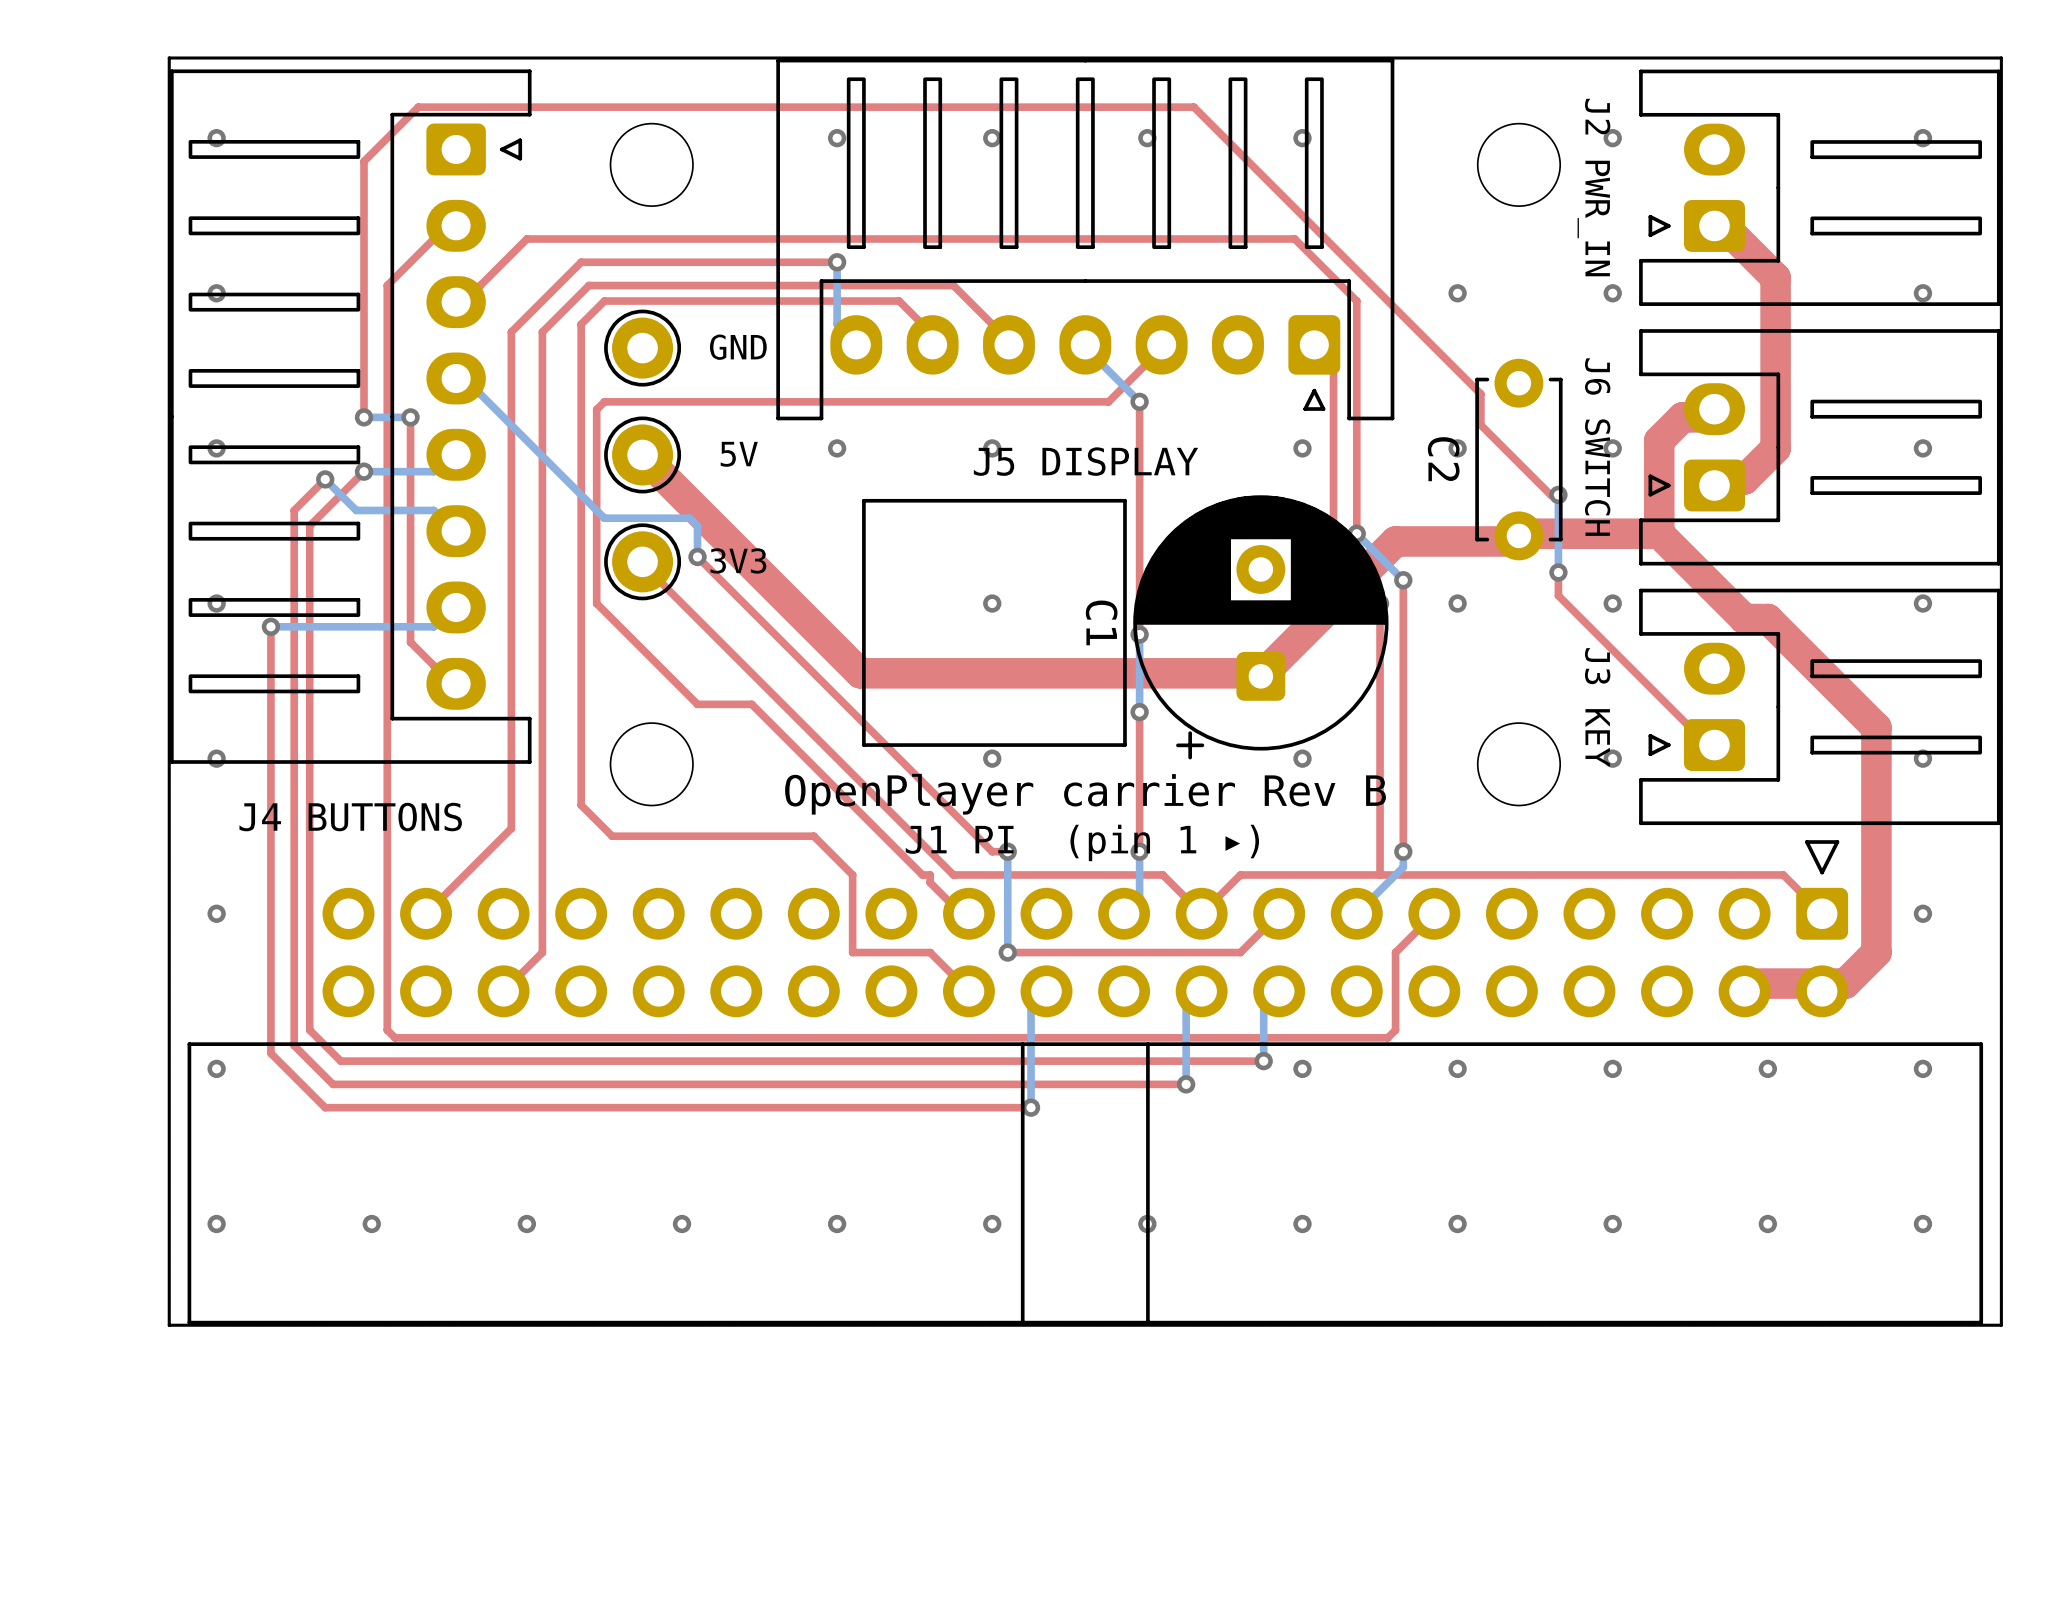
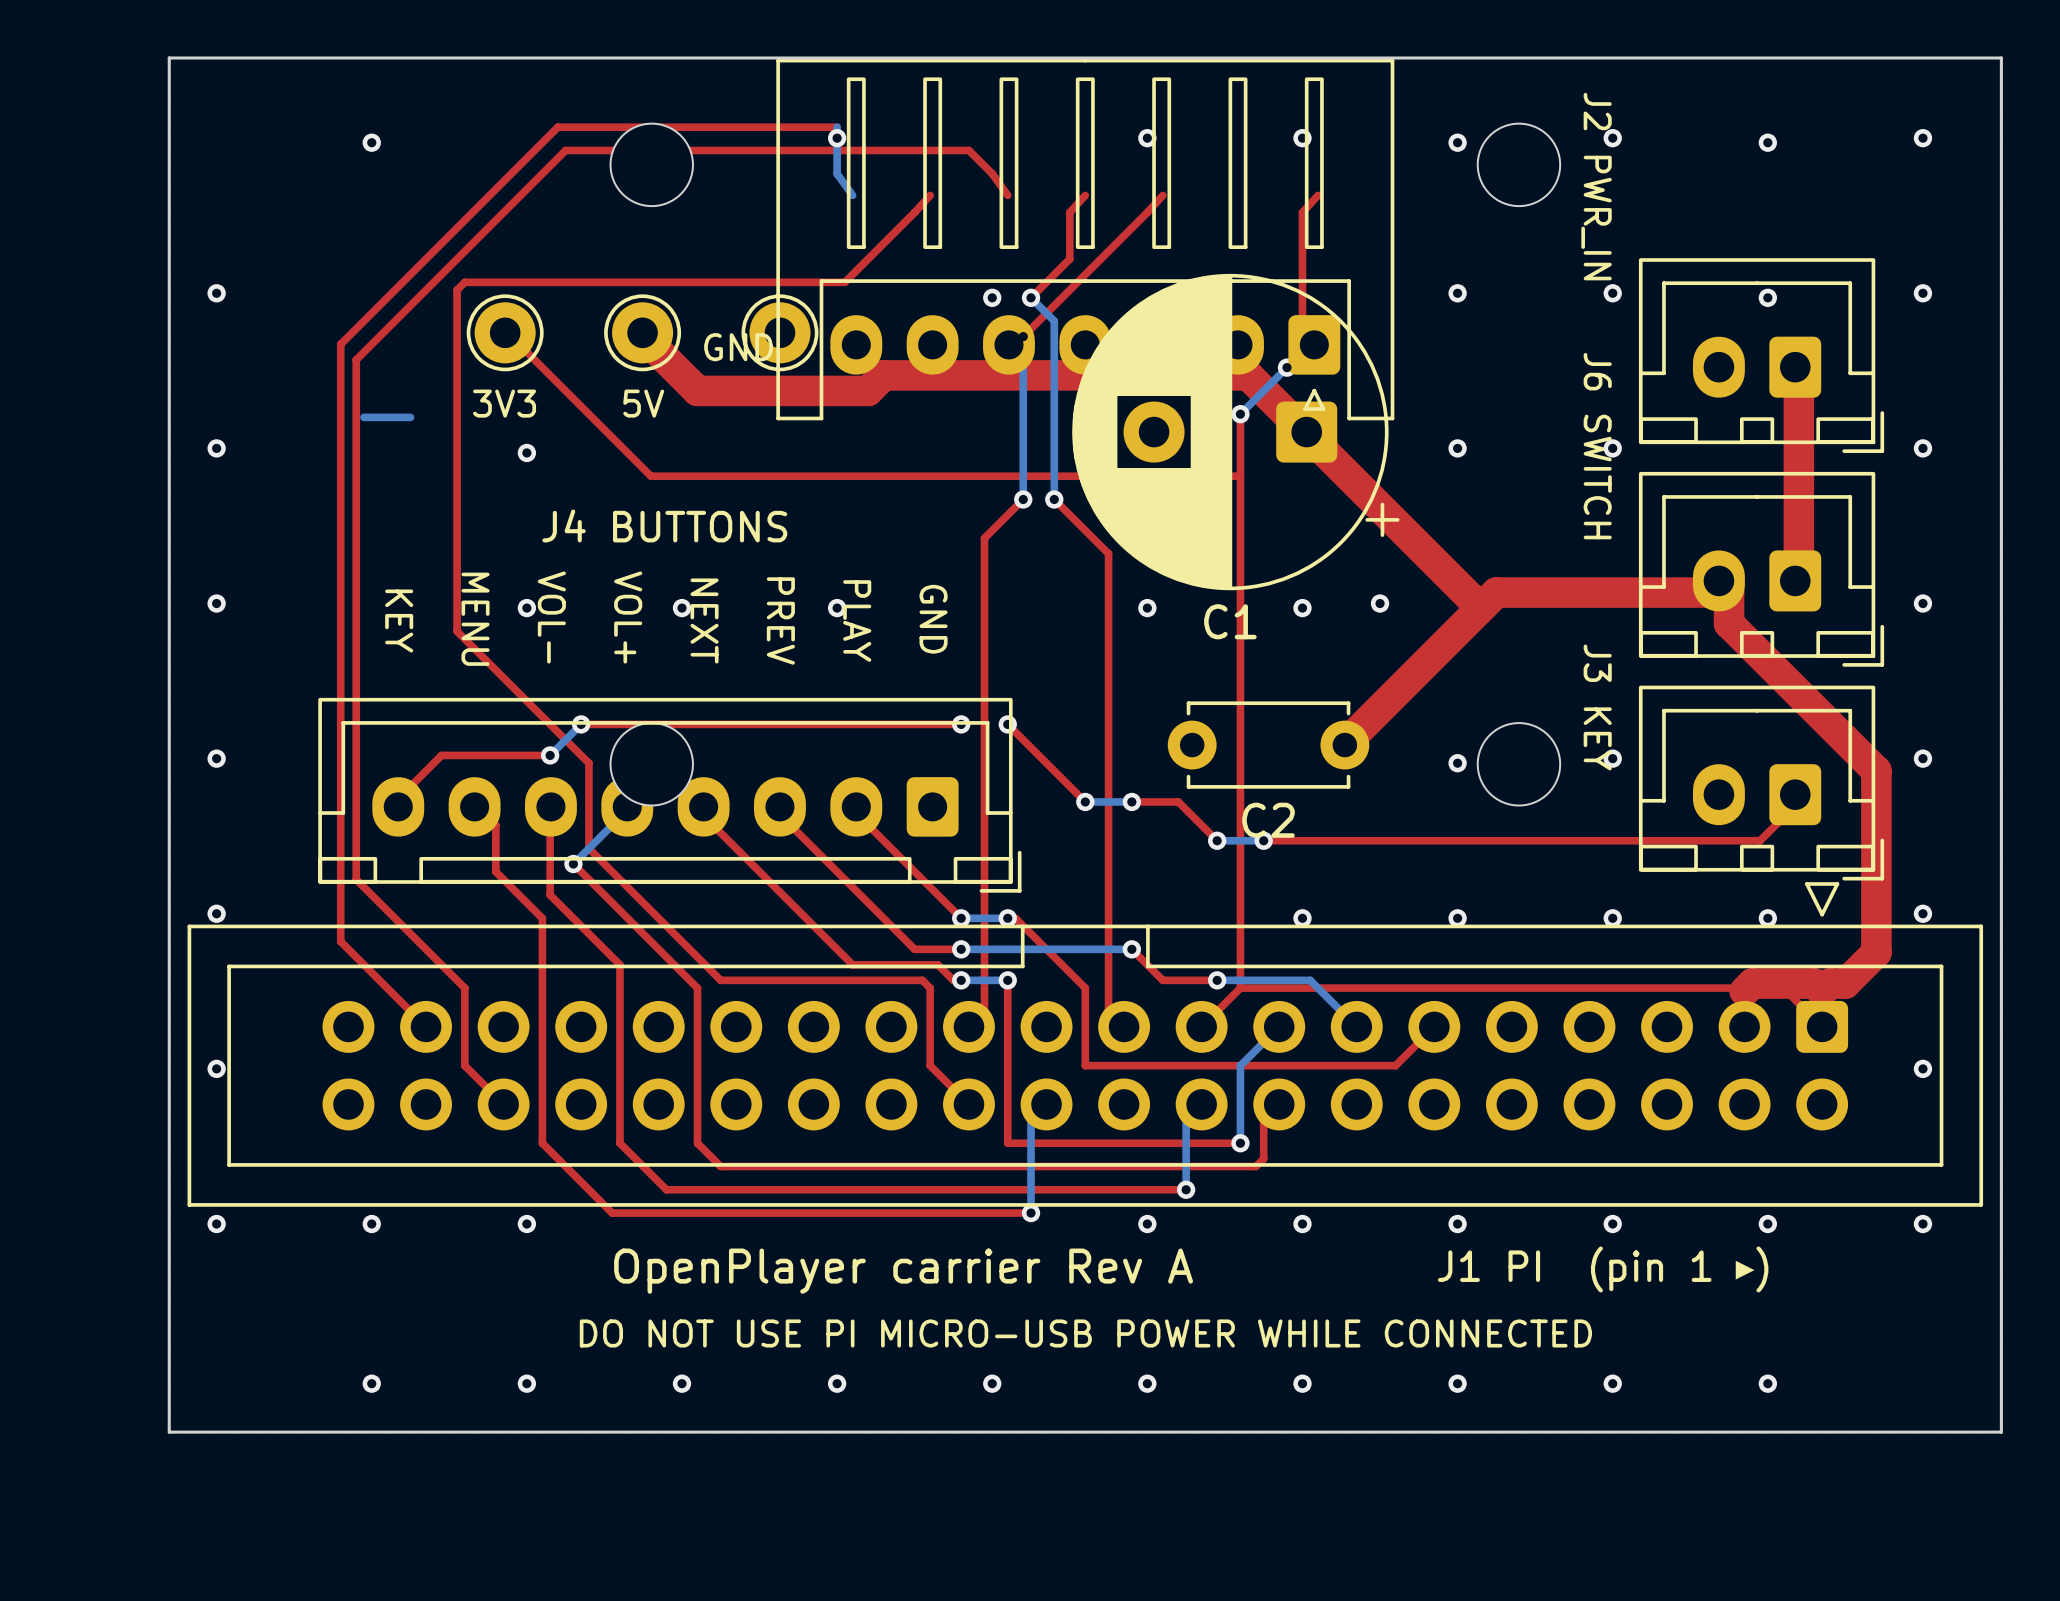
top track: none -> (837, 127) (557, 127) (340, 344) (340, 941) (426, 1026)
bottom track: none -> (837, 127) (837, 173) (852, 195)
via: (216, 138) -> none
via: (992, 138) -> none
via: none -> (371, 142)
via: none -> (1457, 142)
via: none -> (1767, 142)
part: (1819, 187) -> none
top track: none -> (930, 195) (844, 282) (464, 282) (457, 290) (457, 631) (588, 763) (588, 848) (720, 980) (922, 980) (930, 988) (930, 1065) (968, 1104)
top track: none -> (1007, 195) (992, 173) (968, 150) (565, 150) (356, 359) (356, 879) (464, 988) (464, 1065) (503, 1104)
top track: none -> (1085, 195) (1069, 212) (1069, 259) (1031, 297)
top track: none -> (1162, 195) (1023, 336)
top track: none -> (1317, 195) (1302, 212) (1302, 352) (1286, 367)
top track: (456, 225) (433, 238) (387, 285) (387, 1030) (395, 1037) (1387, 1037) (1395, 1030) (1395, 952) (1434, 913) -> none
top track: (1714, 225) (1729, 231) (1775, 277) (1775, 448) (1744, 479) (1729, 479) (1714, 485) -> none
top track: (837, 262) (581, 262) (511, 332) (511, 828) (426, 913) -> none
bottom track: (837, 262) (837, 324) (856, 344) -> none
via: (837, 262) -> none
via: none -> (992, 297)
bottom track: none -> (1031, 297) (1054, 321) (1054, 499)
via: none -> (1031, 297)
via: none -> (1767, 297)
top track: (456, 302) (480, 285) (526, 238) (1294, 238) (1356, 301) (1356, 533) -> none
top track: none -> (505, 332) (650, 476) (1240, 476)
part: none -> (505, 332)
top track: none -> (642, 332) (650, 344) (697, 390) (868, 390) (883, 375) (1248, 375) (1480, 608)
part: none -> (780, 332)
bottom track: none -> (1023, 336) (1023, 499)
via: none -> (1023, 336)
top track: (932, 344) (922, 324) (899, 301) (604, 301) (581, 324) (581, 805) (612, 836) (813, 836) (852, 874) (852, 952) (930, 952) (968, 991) -> none
top track: (1008, 344) (992, 324) (953, 285) (588, 285) (542, 332) (542, 918) -> (474, 806) (495, 825) (495, 871) (542, 918)
bottom track: (1085, 344) (1139, 401) -> none
top track: (1161, 344) (1147, 363) (1108, 401) (604, 401) (596, 409) (596, 603) (697, 704) (751, 704) (922, 874) (930, 874) (930, 882) (953, 906) (968, 913) -> none
top track: (1314, 344) (1333, 363) (1333, 556) -> none
part position: (642, 348) -> (642, 332)
part: none -> (1761, 355)
bottom track: none -> (1286, 367) (1240, 414)
via: none -> (1286, 367)
top track: none -> (1795, 367) (1798, 375) (1798, 569) (1795, 580)
bottom track: (456, 378) (480, 394) (604, 518) (689, 518) (697, 525) (697, 556) -> none
top track: (1139, 401) (1139, 634) -> none
via: (1139, 401) -> none
top track: (1714, 409) (1705, 417) (1682, 417) (1659, 440) (1659, 533) -> none
top track: none -> (1240, 414) (1240, 988)
via: none -> (1240, 414)
part: (350, 416) -> none
top track: (364, 417) (364, 161) (418, 107) (1193, 107) (1480, 394) (1480, 425) (1550, 494) (1558, 494) -> none
via: (364, 417) -> none
top track: (410, 417) (410, 642) (433, 665) (456, 683) -> none
via: (410, 417) -> none
part: (1819, 447) -> none
via: (837, 448) -> none
via: (992, 448) -> none
via: (1302, 448) -> none
via: none -> (526, 452)
bottom track: (456, 454) (433, 471) (364, 471) -> none
top track: (642, 454) (860, 673) (1255, 673) (1260, 676) (1395, 541) (1511, 541) (1518, 535) (1527, 533) (1659, 533) -> none
part: (642, 454) -> none
text position: 5V (739, 454) -> 5V (643, 403)
C2 name position: C2 (1443, 459) -> C2 (1268, 820)
C2 rotation: 0° (1518, 459) -> 90° clockwise (1268, 745)
C2 position: (1518, 459) -> (1268, 745)
text: J5 DISPLAY (1085, 461) -> none
top track: (364, 471) (309, 525) (309, 1030) (340, 1061) (1263, 1061) -> none
via: (364, 471) -> none
top track: (325, 479) (294, 510) (294, 1045) (332, 1084) (1186, 1084) -> none
bottom track: (325, 479) (356, 510) (433, 510) (456, 531) -> none
via: (325, 479) -> none
bottom track: (1558, 494) (1558, 572) -> none
via: (1558, 494) -> none
C1 footprint: [1133, 495, 1389, 760] -> [1072, 273, 1400, 591]
top track: none -> (1023, 499) (984, 538) (984, 1011) (968, 1026)
via: none -> (1023, 499)
top track: none -> (1054, 499) (1108, 553) (1108, 1011) (1124, 1026)
via: none -> (1054, 499)
line: (1124, 500) (863, 500) (863, 745) (1124, 745) (1124, 500) -> none
bottom track: (1356, 533) (1403, 580) -> none
via: (1356, 533) -> none
top track: (1659, 533) (1744, 619) (1767, 619) (1876, 727) (1876, 770) -> (1344, 745) (1496, 592) (1713, 592) (1718, 580) (1729, 592) (1729, 623) (1876, 770)
top track: (697, 556) (992, 851) (1007, 851) -> none
via position: (697, 556) -> (682, 608)
text position: 3V3 (738, 560) -> 3V3 (504, 403)
top track: (642, 561) (953, 874) (1162, 874) (1201, 913) (1240, 874) (1783, 874) (1822, 913) -> none
part: (642, 561) -> none
part: none -> (1761, 569)
top track: (1558, 572) (1558, 595) (1690, 727) (1714, 745) -> none
via: (1558, 572) -> none
top track: (1403, 580) (1403, 851) -> none
via: (1403, 580) -> none
via: (992, 603) -> none
top track: (1380, 603) (1380, 874) -> none
via: (1457, 603) -> none
via: (1612, 603) -> none
bottom track: (456, 607) (433, 626) (270, 626) -> none
via: none -> (526, 608)
via: none -> (837, 608)
via: none -> (1302, 608)
text: none -> VOL- (551, 617)
text: none -> MENU (475, 619)
text: none -> VOL+ (628, 617)
text: none -> GND (933, 619)
text: none -> KEY (399, 620)
text: none -> NEXT (704, 620)
text: none -> PREV (780, 620)
text: none -> PLAY (857, 620)
C1 name position: C1 (1101, 622) -> C1 (1230, 621)
top track: (270, 626) (270, 1053) (325, 1107) (1031, 1107) -> none
via: (270, 626) -> none
bottom track: (1139, 634) (1139, 712) -> none
via position: (1139, 634) -> (1147, 608)
part: (1819, 706) -> none
top track: (1139, 712) (1139, 851) -> none
via: (1139, 712) -> none
bottom track: none -> (581, 724) (550, 755)
via: none -> (581, 724)
top track: none -> (961, 724) (581, 724)
via: none -> (961, 724)
top track: none -> (1007, 724) (1085, 801)
via: none -> (1007, 724)
top track: none -> (550, 755) (441, 755) (410, 786) (398, 806)
via: none -> (550, 755)
via: (992, 758) -> none
via: (1302, 758) -> none
via: none -> (1457, 763)
part: none -> (1761, 783)
text: OpenPlayer carrier Rev B (1085, 794) -> none
top track: none -> (1795, 794) (1783, 817) (1760, 840) (1263, 840)
part: none -> (669, 795)
via: none -> (1085, 801)
top track: none -> (1131, 801) (1178, 801) (1217, 840)
bottom track: none -> (1131, 801) (1085, 801)
via: none -> (1131, 801)
top track: none -> (550, 806) (550, 895) (619, 964) (619, 1143) (666, 1189) (1186, 1189)
bottom track: none -> (627, 806) (612, 825) (573, 864)
top track: none -> (703, 806) (713, 825) (852, 964) (937, 964) (953, 980) (961, 980)
top track: none -> (779, 806) (790, 825) (914, 949) (961, 949)
top track: none -> (856, 806) (868, 825) (961, 918)
text position: J4 BUTTONS (350, 817) -> J4 BUTTONS (664, 525)
via: none -> (1217, 840)
bottom track: none -> (1263, 840) (1217, 840)
via: none -> (1263, 840)
text position: J1 PI (pin 1 ▸) (1082, 842) -> J1 PI (pin 1 ▸) (1603, 1269)
bottom track: (1007, 851) (1007, 952) -> none
via: (1007, 851) -> none
bottom track: (1139, 851) (1139, 898) (1124, 913) -> none
via: (1139, 851) -> none
bottom track: (1403, 851) (1403, 867) (1356, 913) -> none
via: (1403, 851) -> none
top track: none -> (573, 864) (697, 988) (697, 1143) (720, 1166) (1255, 1166) (1263, 1158) (1263, 1119) (1279, 1104)
via: none -> (573, 864)
top track: (1279, 913) (1240, 952) (1007, 952) -> none
via: none -> (961, 918)
top track: none -> (1007, 918) (1015, 918) (1085, 988) (1085, 1065) (1395, 1065) (1434, 1026)
bottom track: none -> (1007, 918) (961, 918)
via: none -> (1007, 918)
via: none -> (1302, 918)
via: none -> (1457, 918)
via: none -> (1612, 918)
via: none -> (1767, 918)
via: none -> (961, 949)
top track: none -> (1131, 949) (1162, 980) (1217, 980)
bottom track: none -> (1131, 949) (961, 949)
via: none -> (1131, 949)
top track: (542, 952) (503, 991) -> (542, 952) (542, 1143) (612, 1213) (1031, 1213)
via: (1007, 952) -> none
via: none -> (961, 980)
top track: none -> (1007, 980) (1007, 1143) (1240, 1143)
bottom track: none -> (1007, 980) (961, 980)
via: none -> (1007, 980)
bottom track: none -> (1217, 980) (1310, 980) (1356, 1026)
via: none -> (1217, 980)
top track: none -> (1240, 988) (1201, 1026)
top track: none -> (1240, 988) (1783, 988) (1822, 1026)
bottom track: (1046, 991) (1031, 1006) (1031, 1107) -> none
bottom track: (1201, 991) (1186, 1006) (1186, 1084) -> none
bottom track: (1279, 991) (1263, 1006) (1263, 1061) -> none
bottom track: none -> (1279, 1026) (1240, 1065) (1240, 1143)
part: none -> (1085, 1044)
via: (1263, 1061) -> none
via: (1302, 1068) -> none
via: (1457, 1068) -> none
via: (1612, 1068) -> none
via: (1767, 1068) -> none
part: (1085, 1082) -> none
via: (1186, 1084) -> none
bottom track: none -> (1046, 1104) (1031, 1119) (1031, 1213)
bottom track: none -> (1201, 1104) (1186, 1119) (1186, 1189)
via: (1031, 1107) -> none
via: none -> (1240, 1143)
via: none -> (1186, 1189)
via: (682, 1224) -> none
via: (837, 1224) -> none
via position: (992, 1224) -> (1031, 1213)
text: none -> OpenPlayer carrier Rev A (903, 1271)
board edge: (2001, 1325) (169, 1325) -> (2001, 1325) (2001, 1432) (169, 1432) (169, 1325)
text: none -> DO NOT USE PI MICRO-USB POWER WHILE CONNECTED (1085, 1333)
via: none -> (371, 1383)
via: none -> (526, 1383)
via: none -> (682, 1383)
via: none -> (837, 1383)
via: none -> (992, 1383)
via: none -> (1147, 1383)
via: none -> (1302, 1383)
via: none -> (1457, 1383)
via: none -> (1612, 1383)
via: none -> (1767, 1383)

